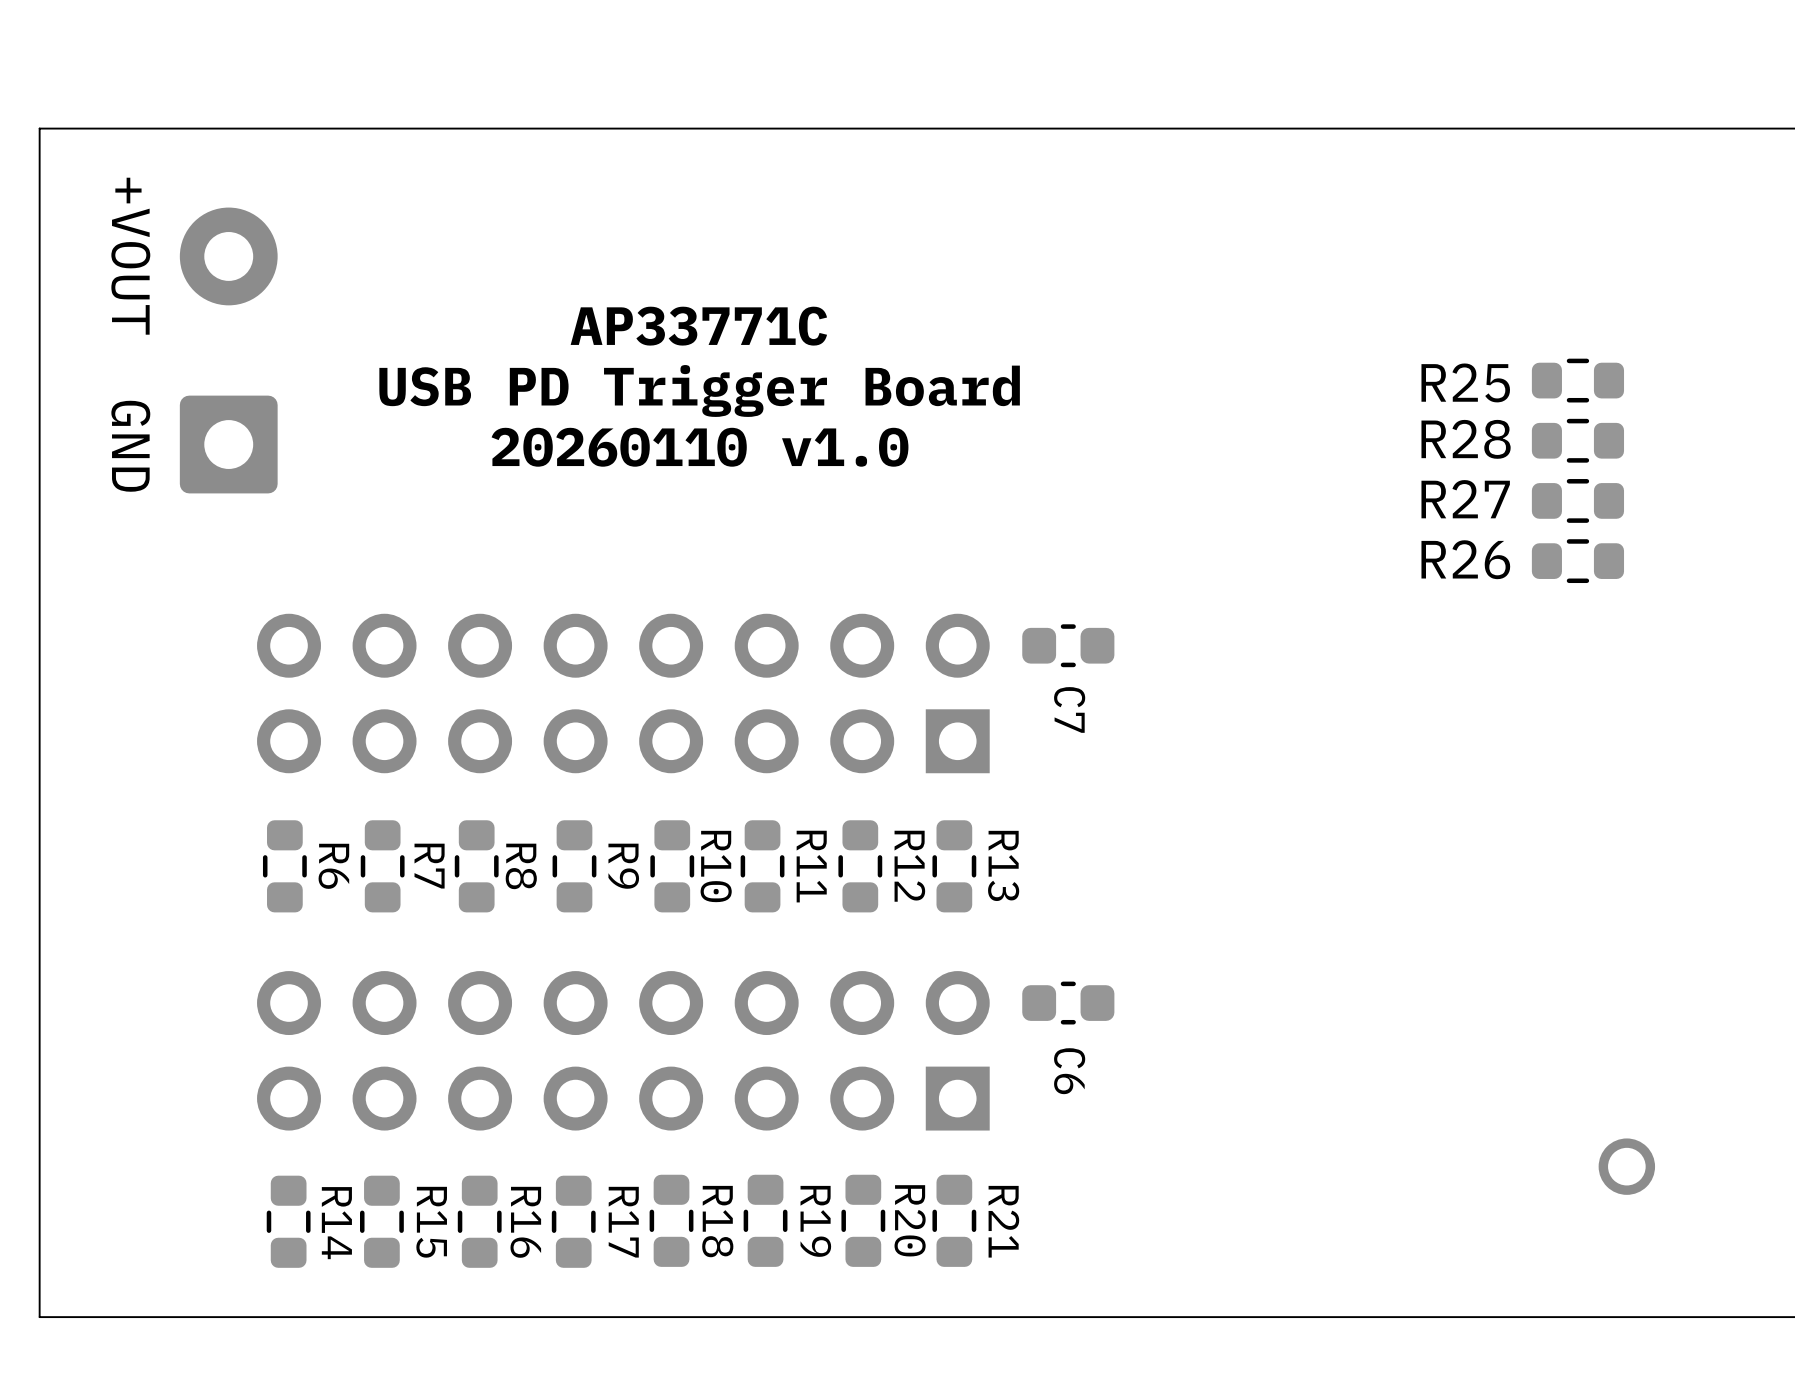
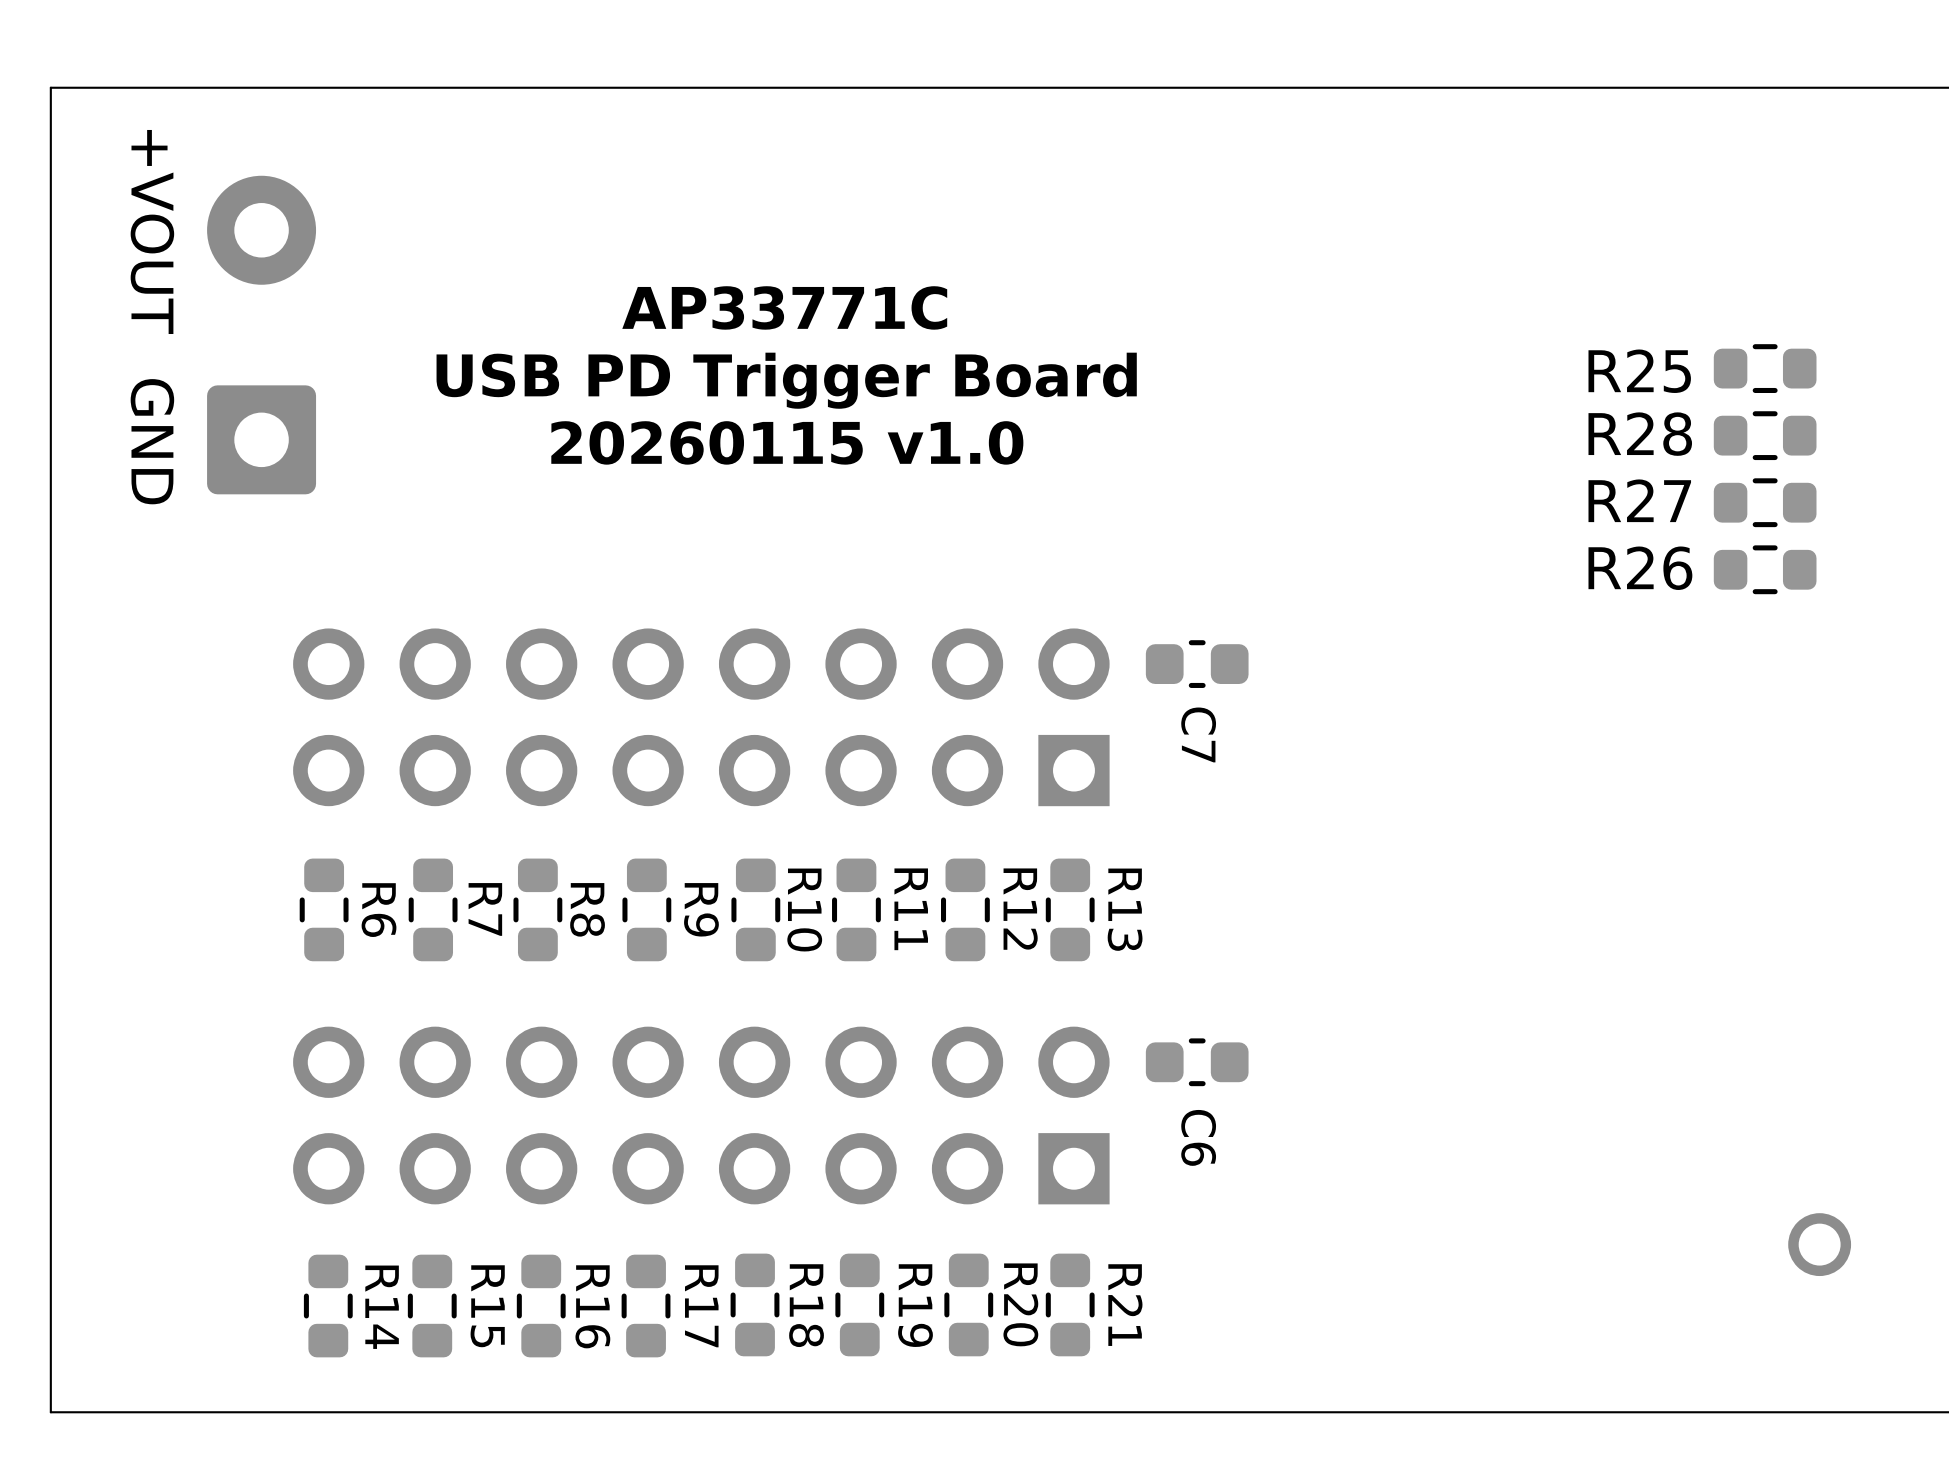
text: 20260110 v1.0 (700, 447) -> 20260115 v1.0 (787, 442)

